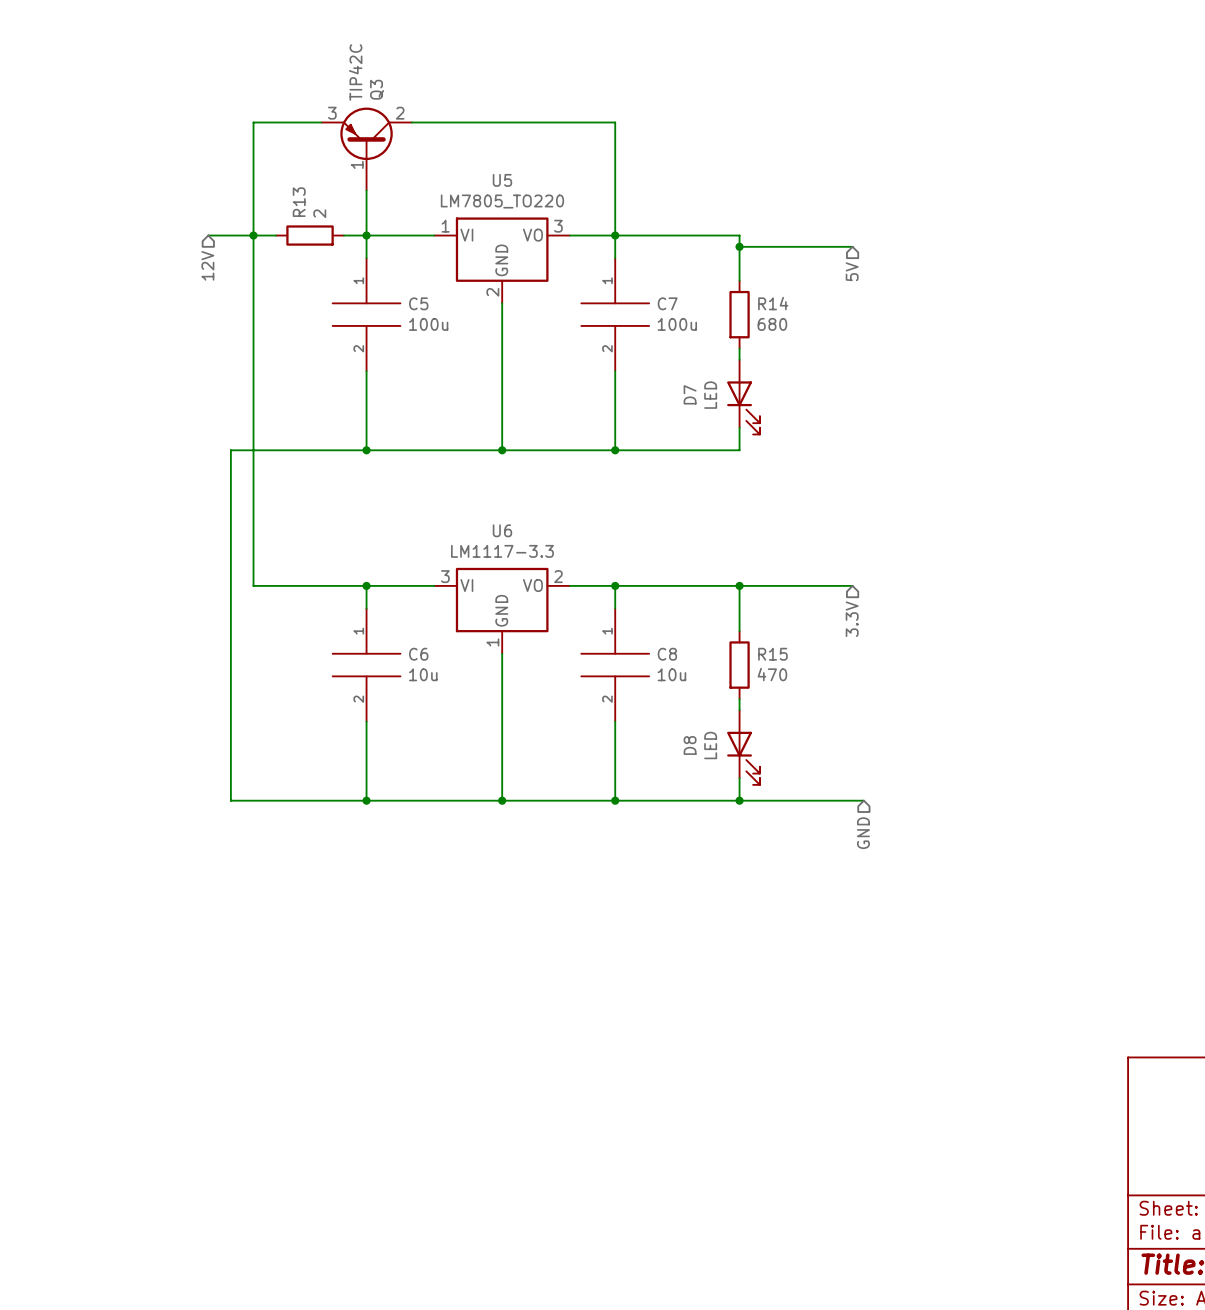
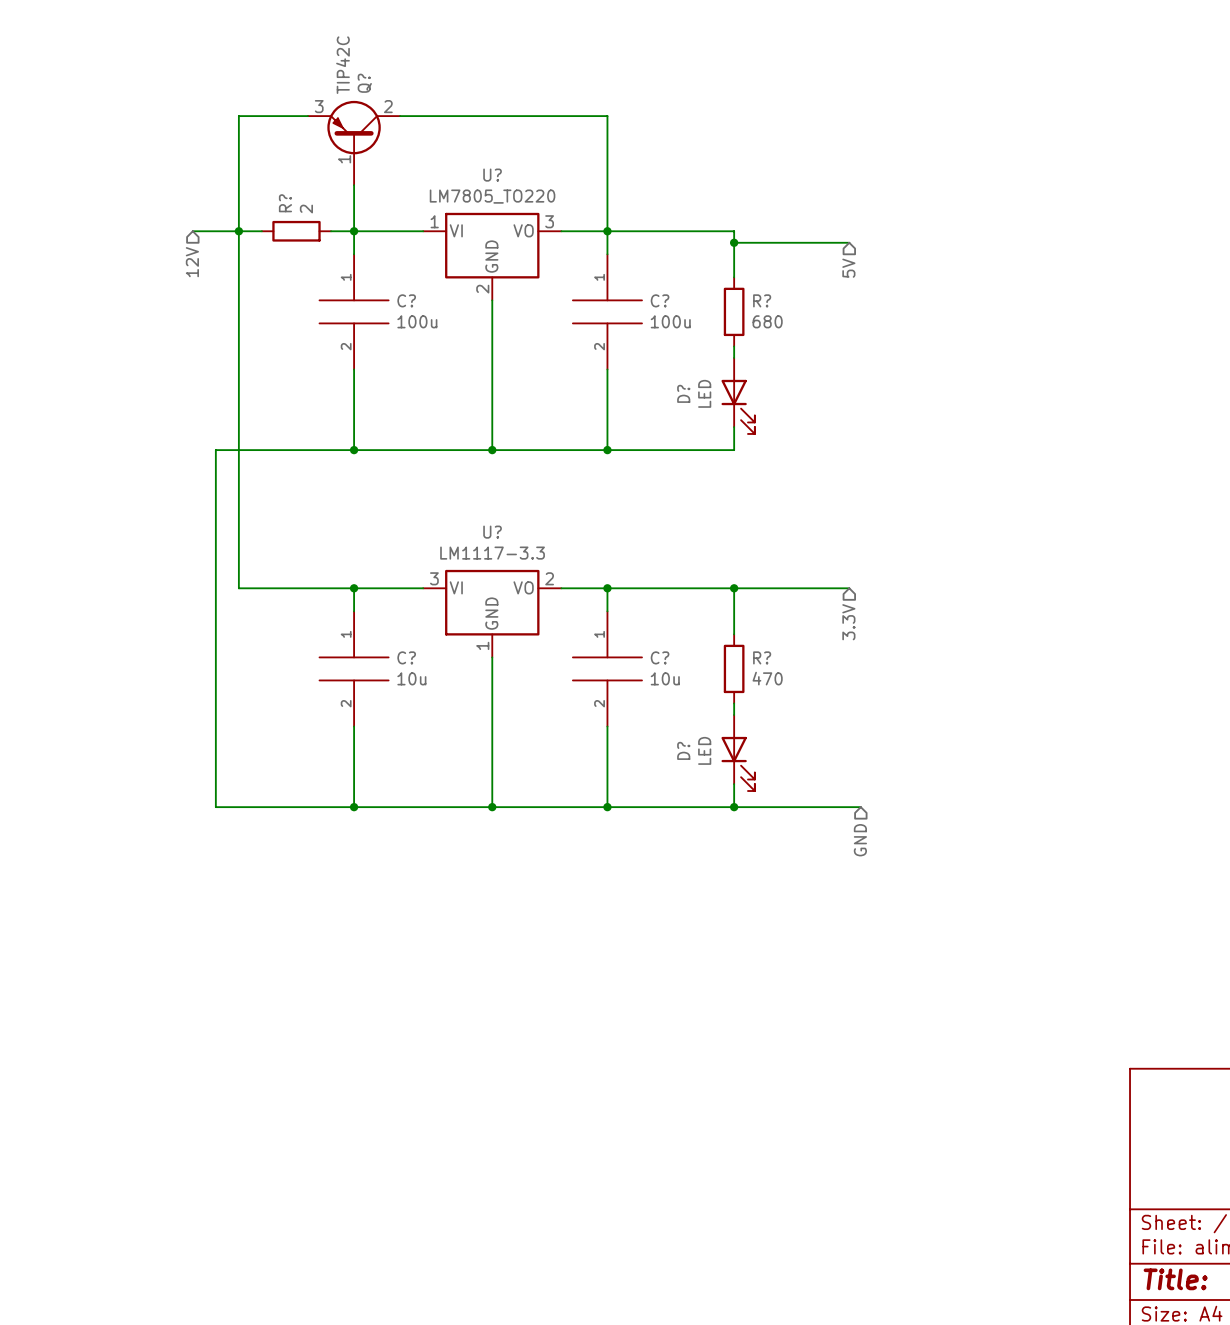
Q3 name: Q3 (377, 89) -> Q? (364, 83)
U5 name: U5 (502, 180) -> U? (492, 175)
R13 name: R13 (299, 202) -> R? (285, 203)
C5 name: C5 (418, 303) -> C? (406, 300)
C7 name: C7 (667, 303) -> C? (660, 300)
R14 name: R14 (773, 303) -> R? (762, 300)
D7 name: D7 (690, 394) -> D? (683, 393)
U6 name: U6 (502, 530) -> U? (492, 532)
C6 name: C6 (418, 654) -> C? (406, 657)
C8 name: C8 (667, 654) -> C? (660, 657)
R15 name: R15 (772, 654) -> R? (762, 657)
D8 name: D8 (690, 745) -> D? (683, 750)

